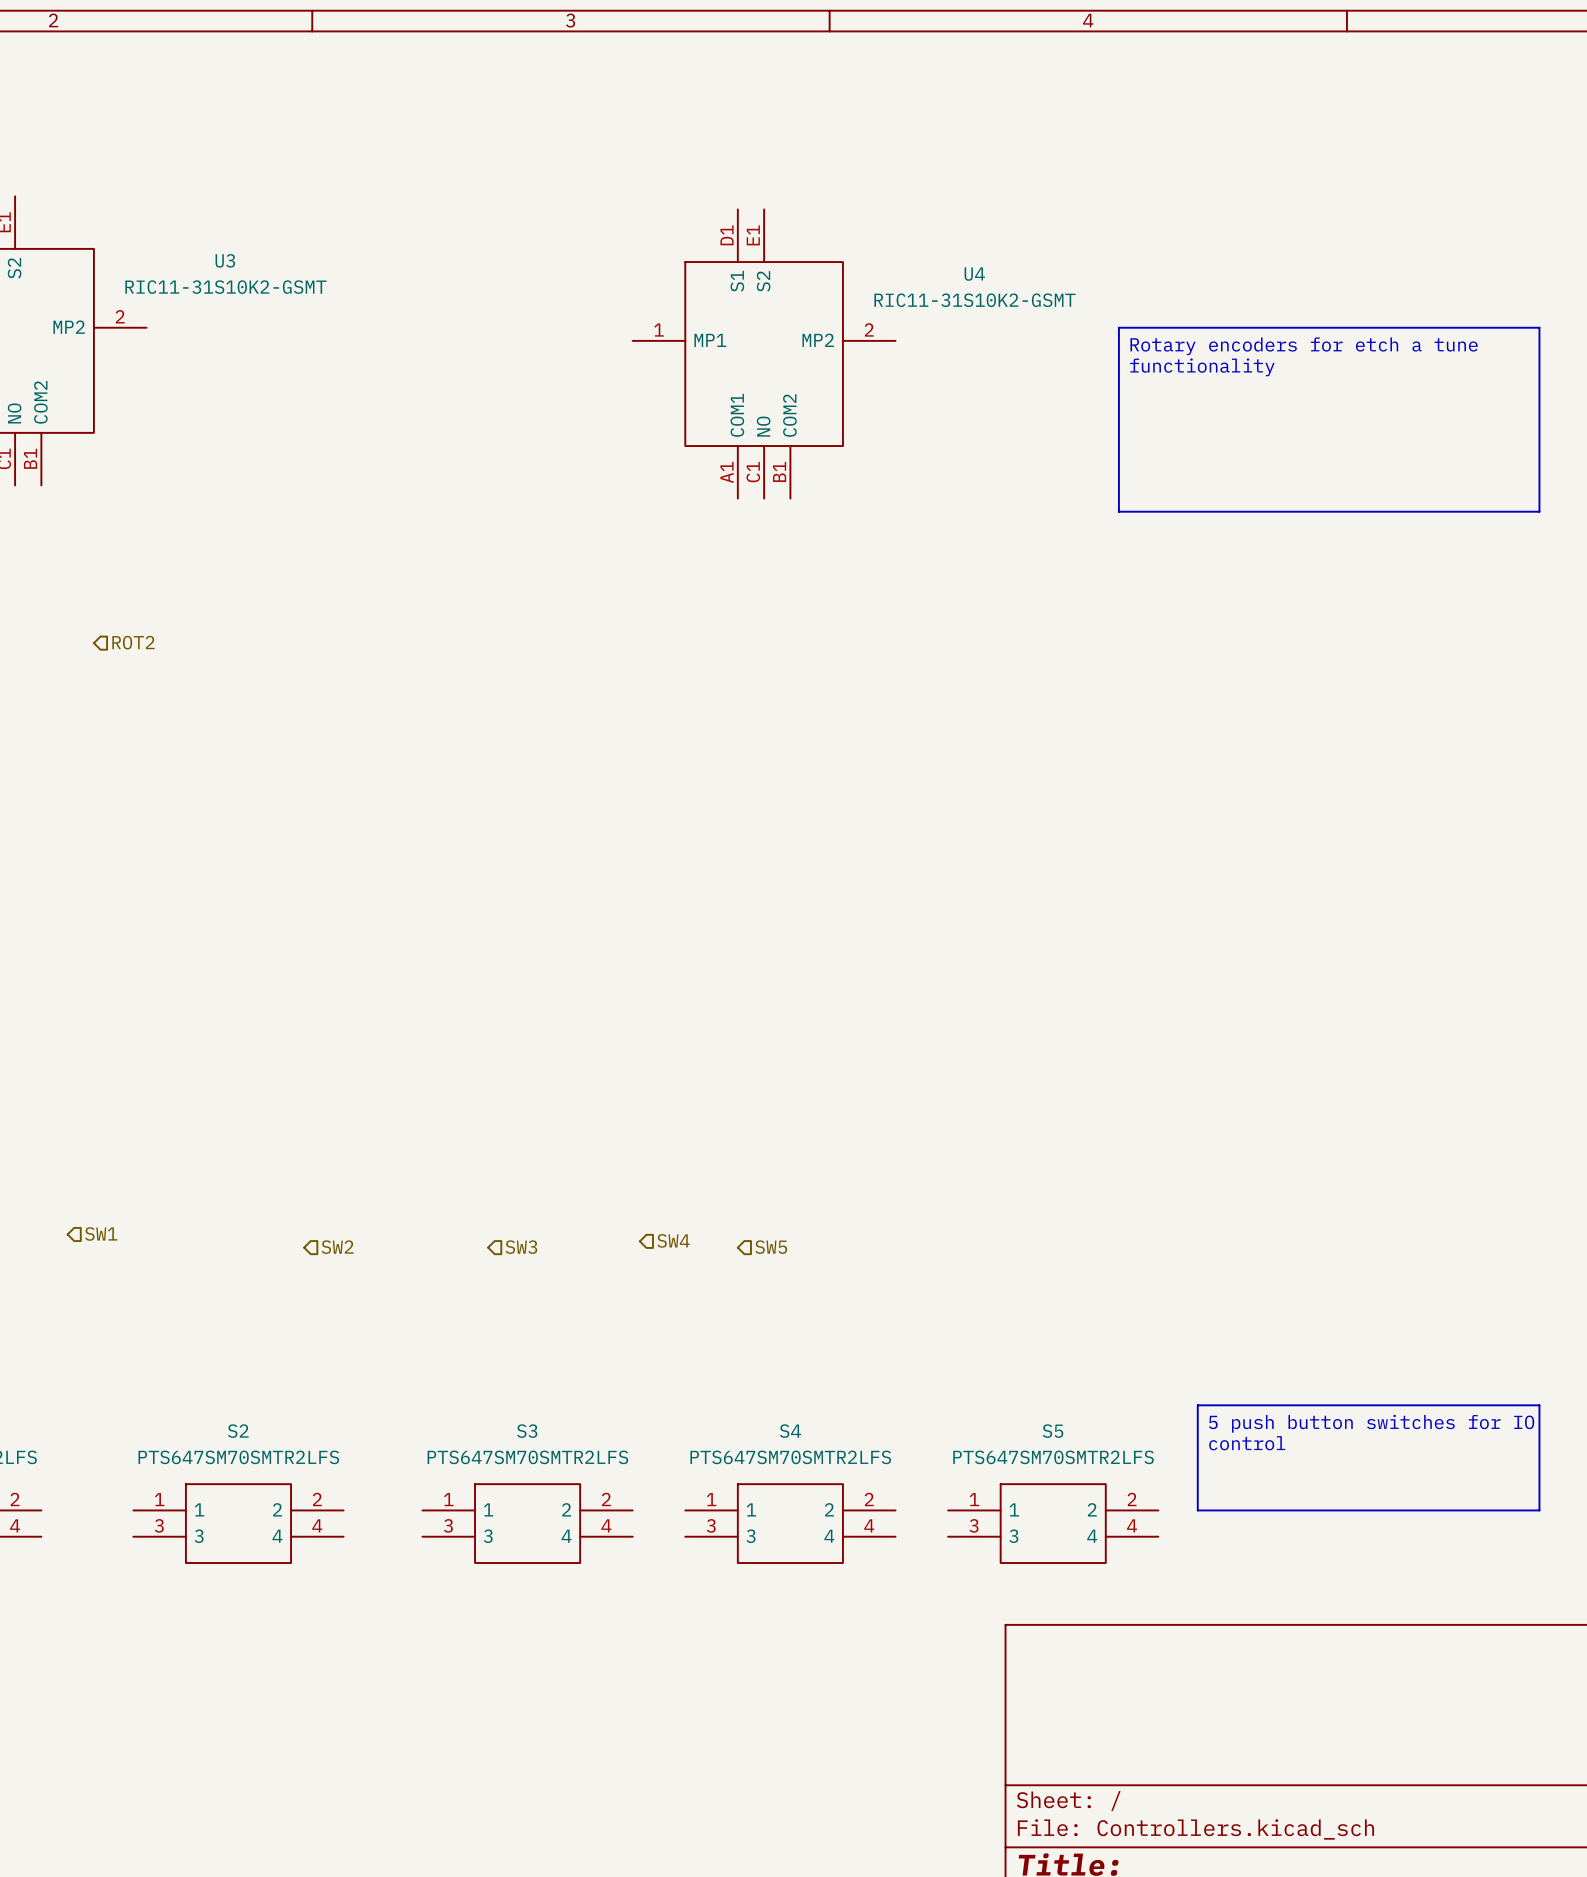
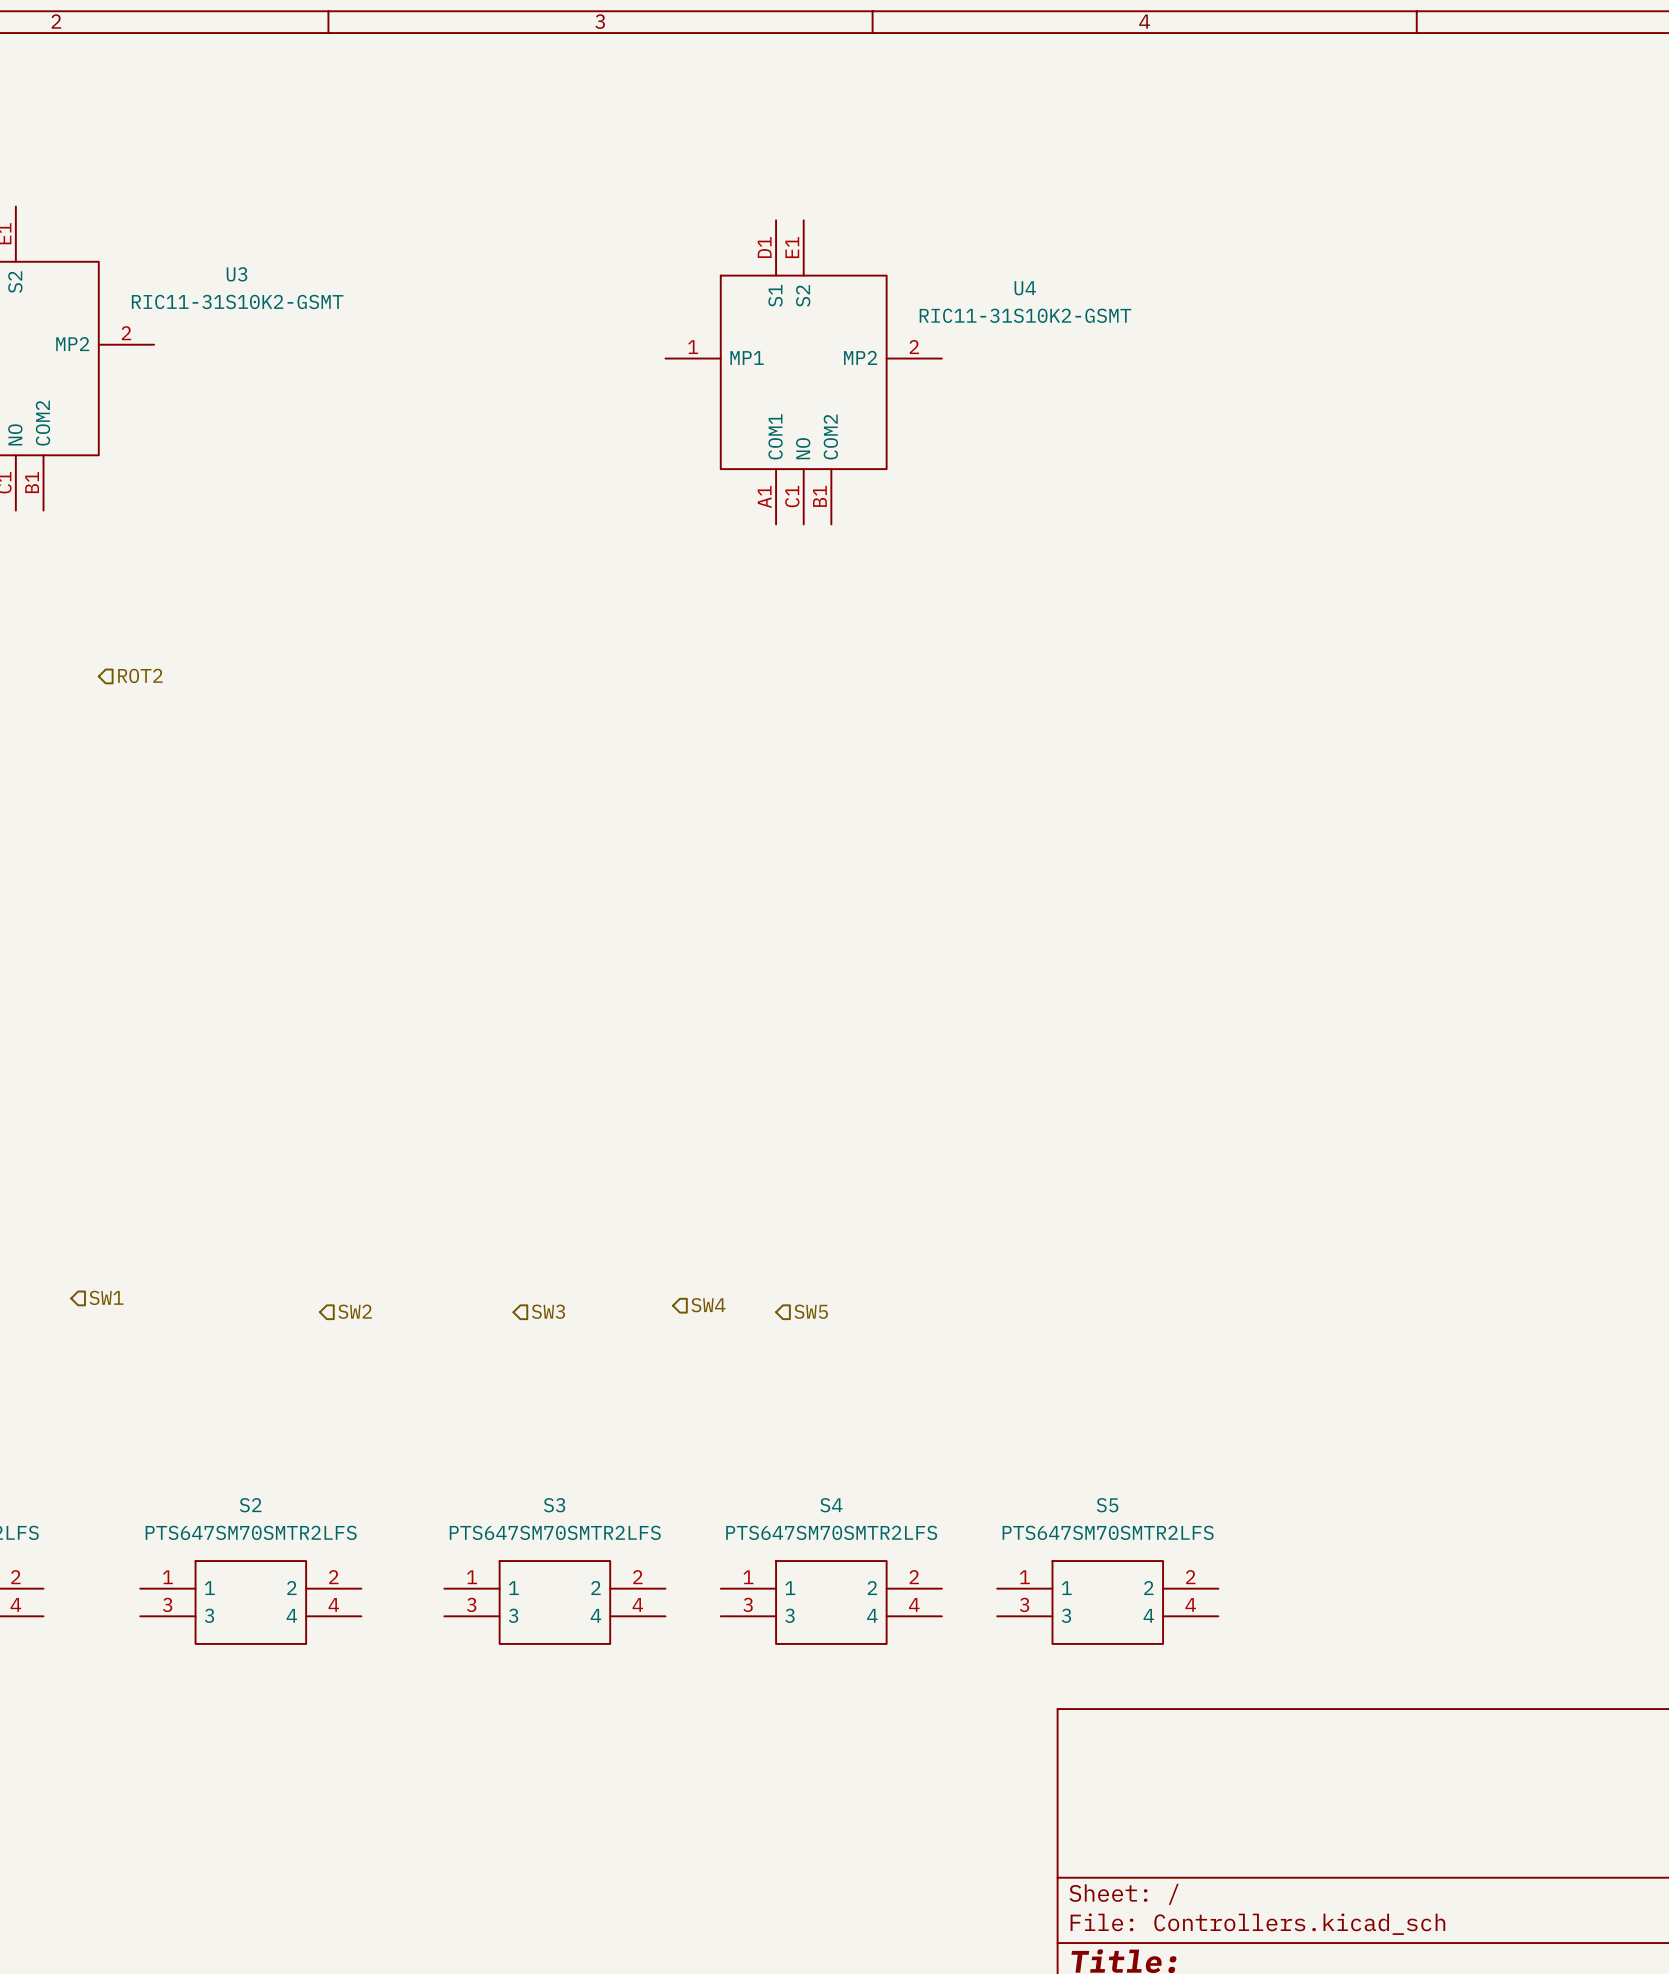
line: (1118, 327) (1539, 327) (1539, 511) (1118, 511) (1118, 327) -> none
text: Rotary encoders for etch a tune (1304, 346) -> none
text: functionality (1202, 367) -> none
line: (1197, 1405) (1539, 1405) (1539, 1510) (1197, 1510) (1197, 1405) -> none
text: 5 push button switches for IO (1371, 1423) -> none
text: control (1247, 1443) -> none

